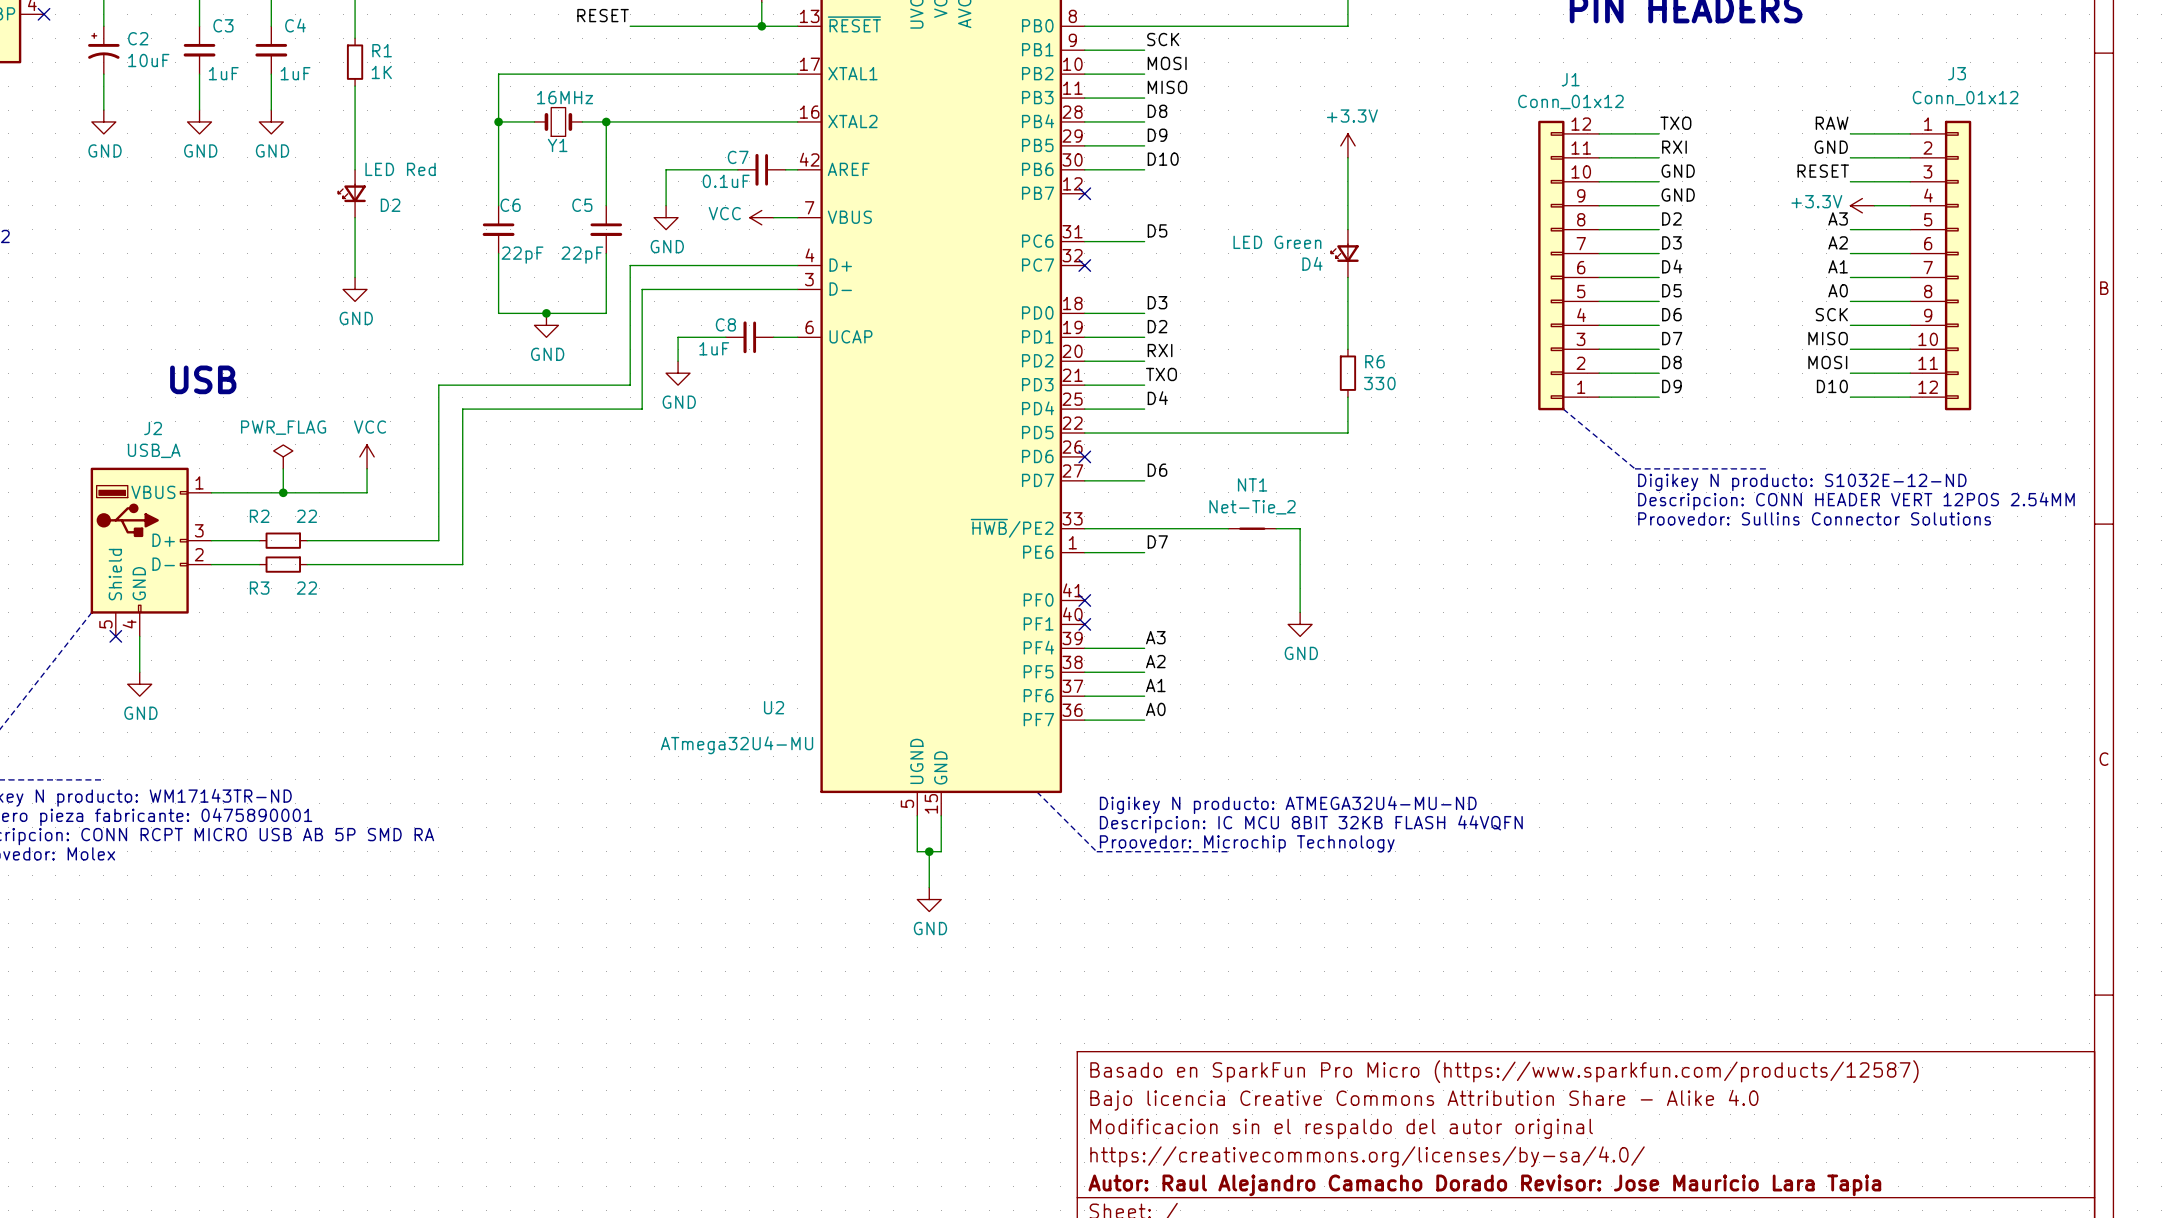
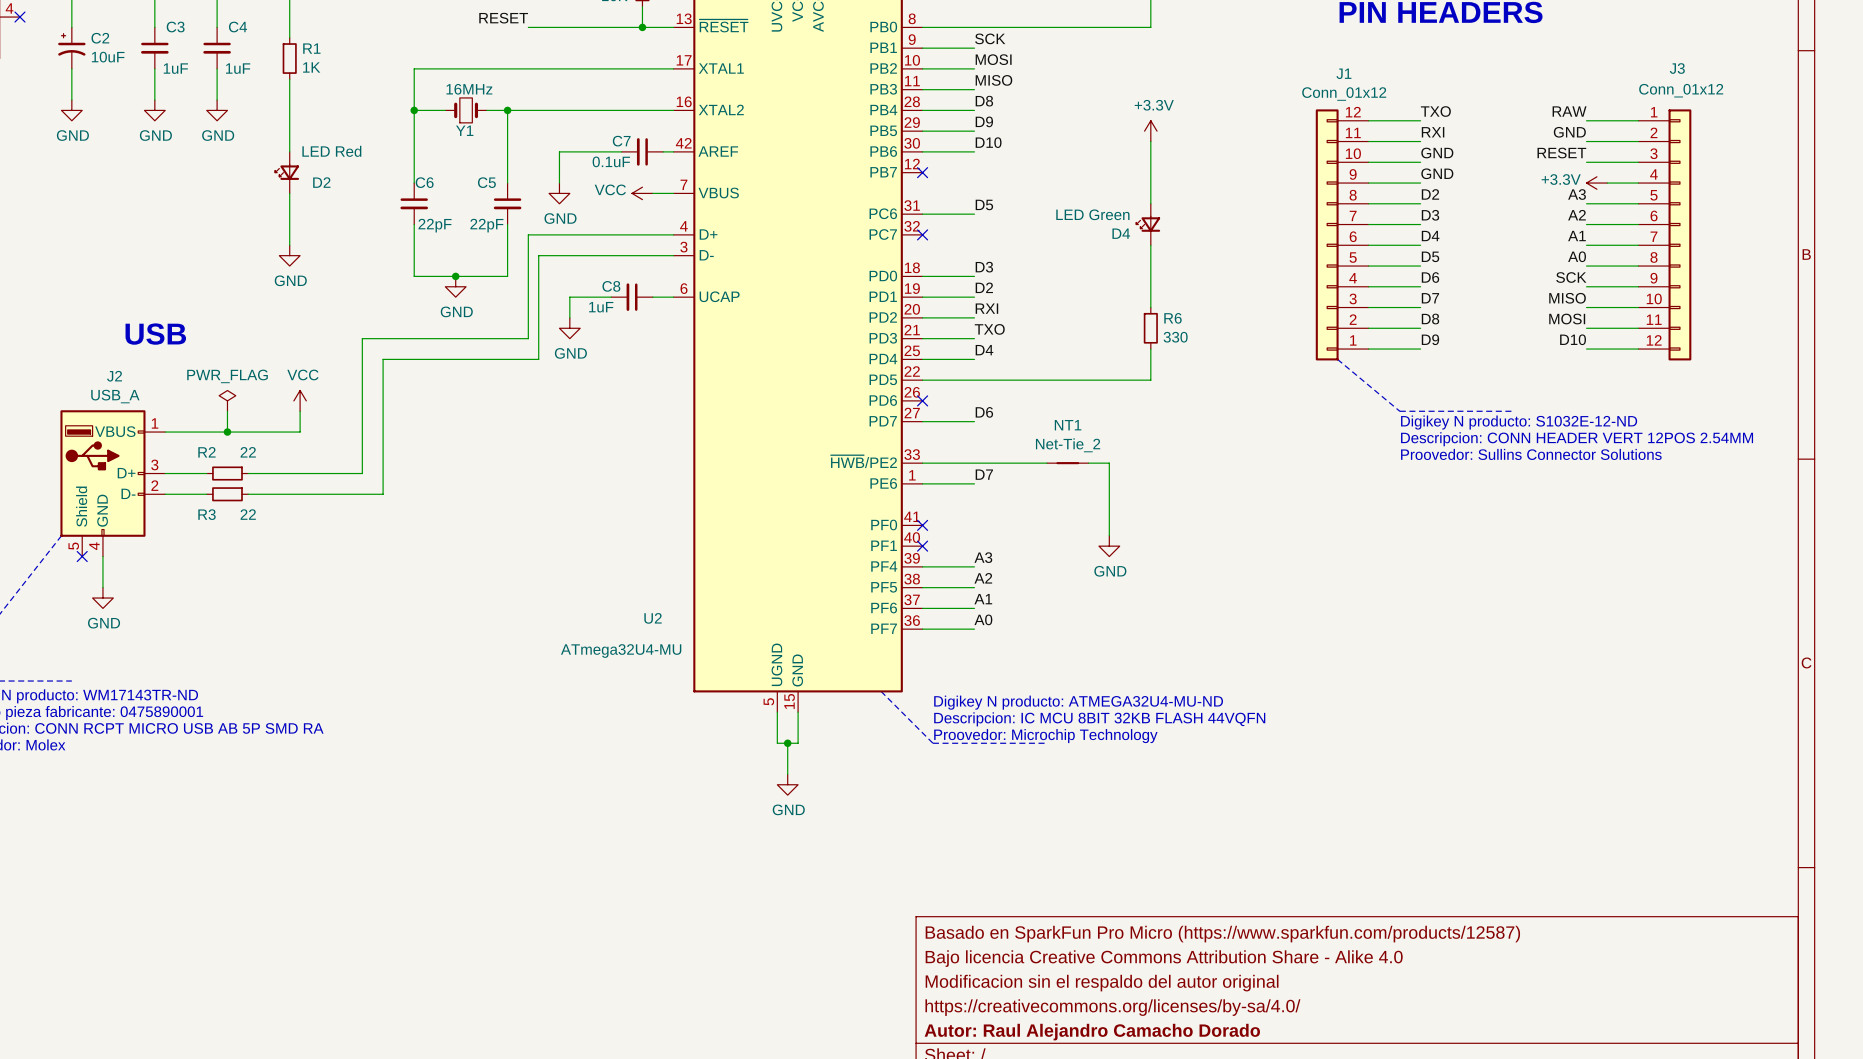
title block: Autor: Raul Alejandro Camacho Dorado Revisor: Jose Mauricio Lara Tapia (1484, 1185) -> Autor: Raul Alejandro Camacho Dorado (1092, 1032)

